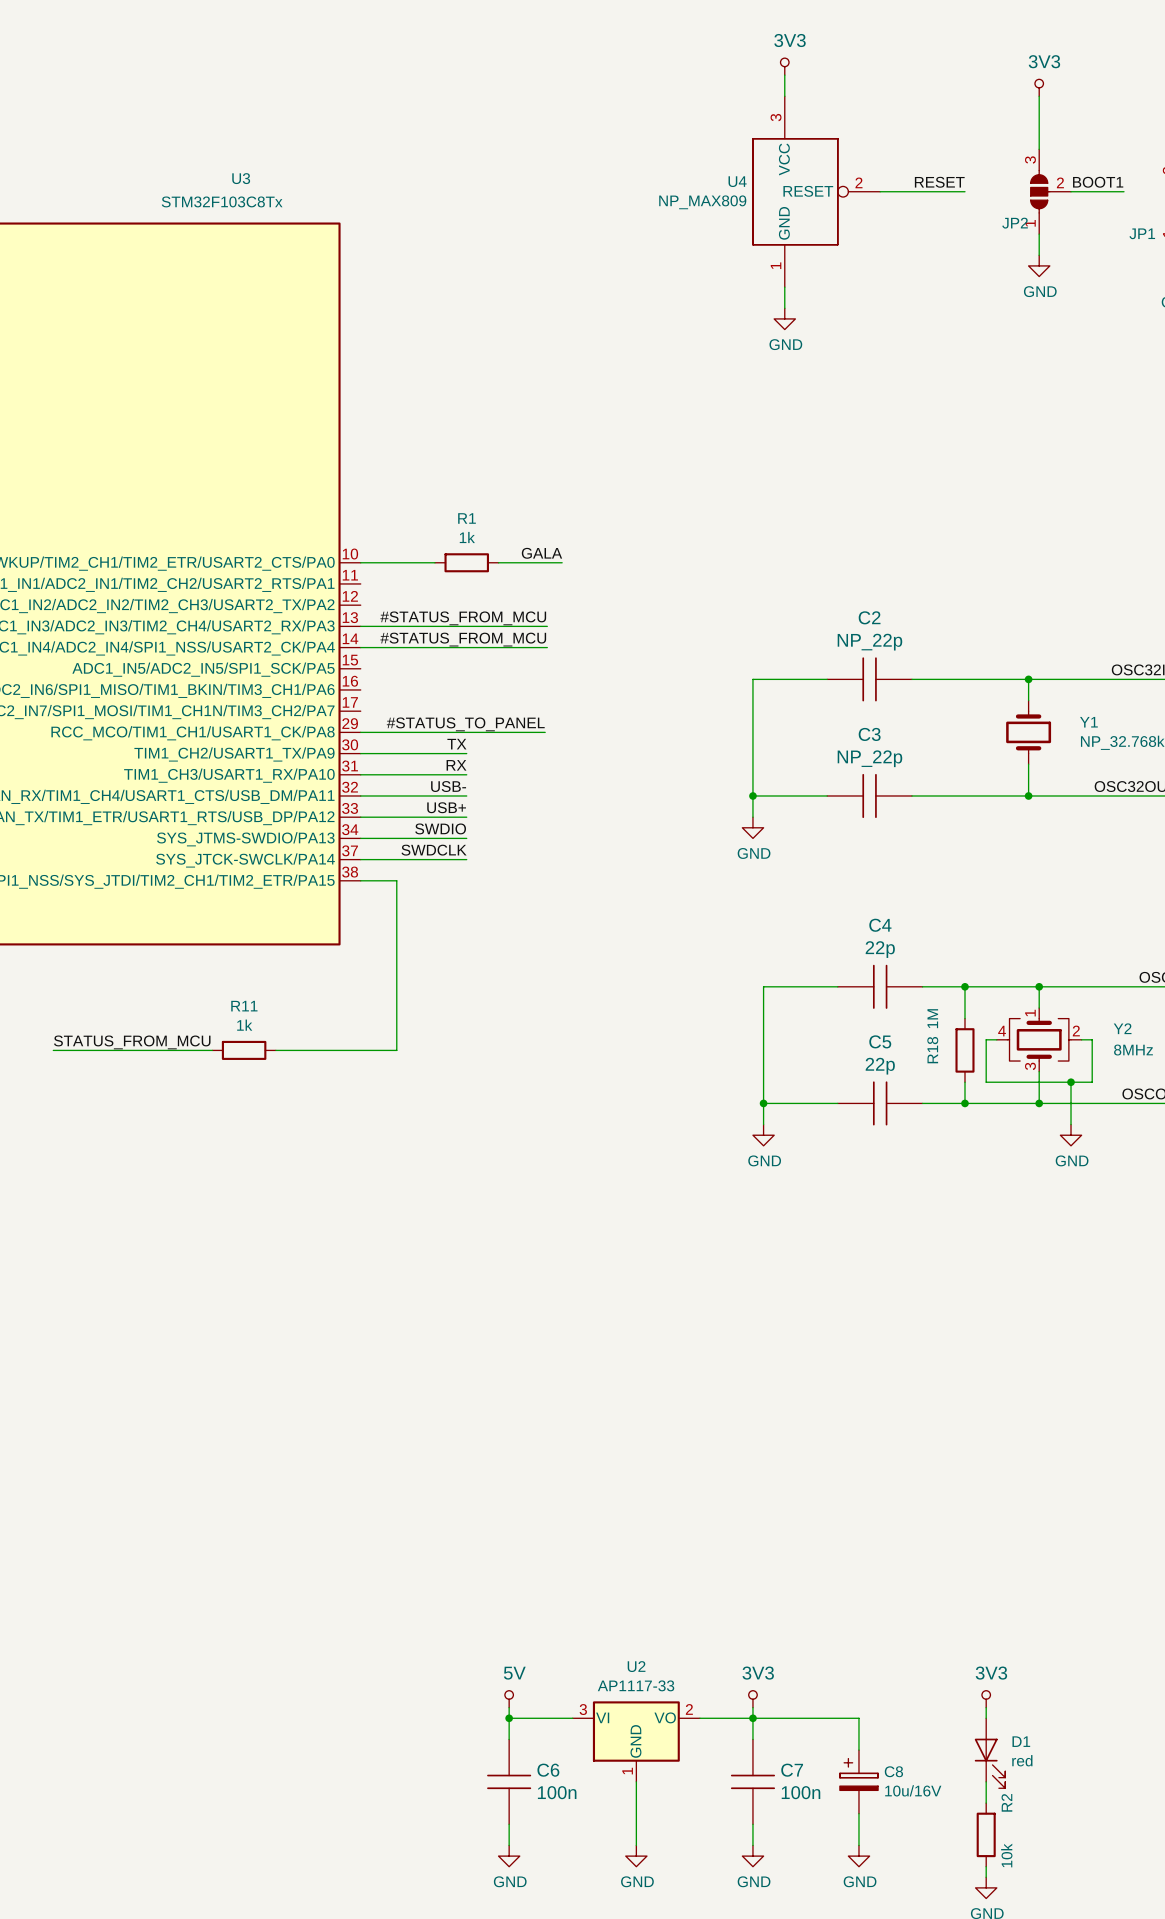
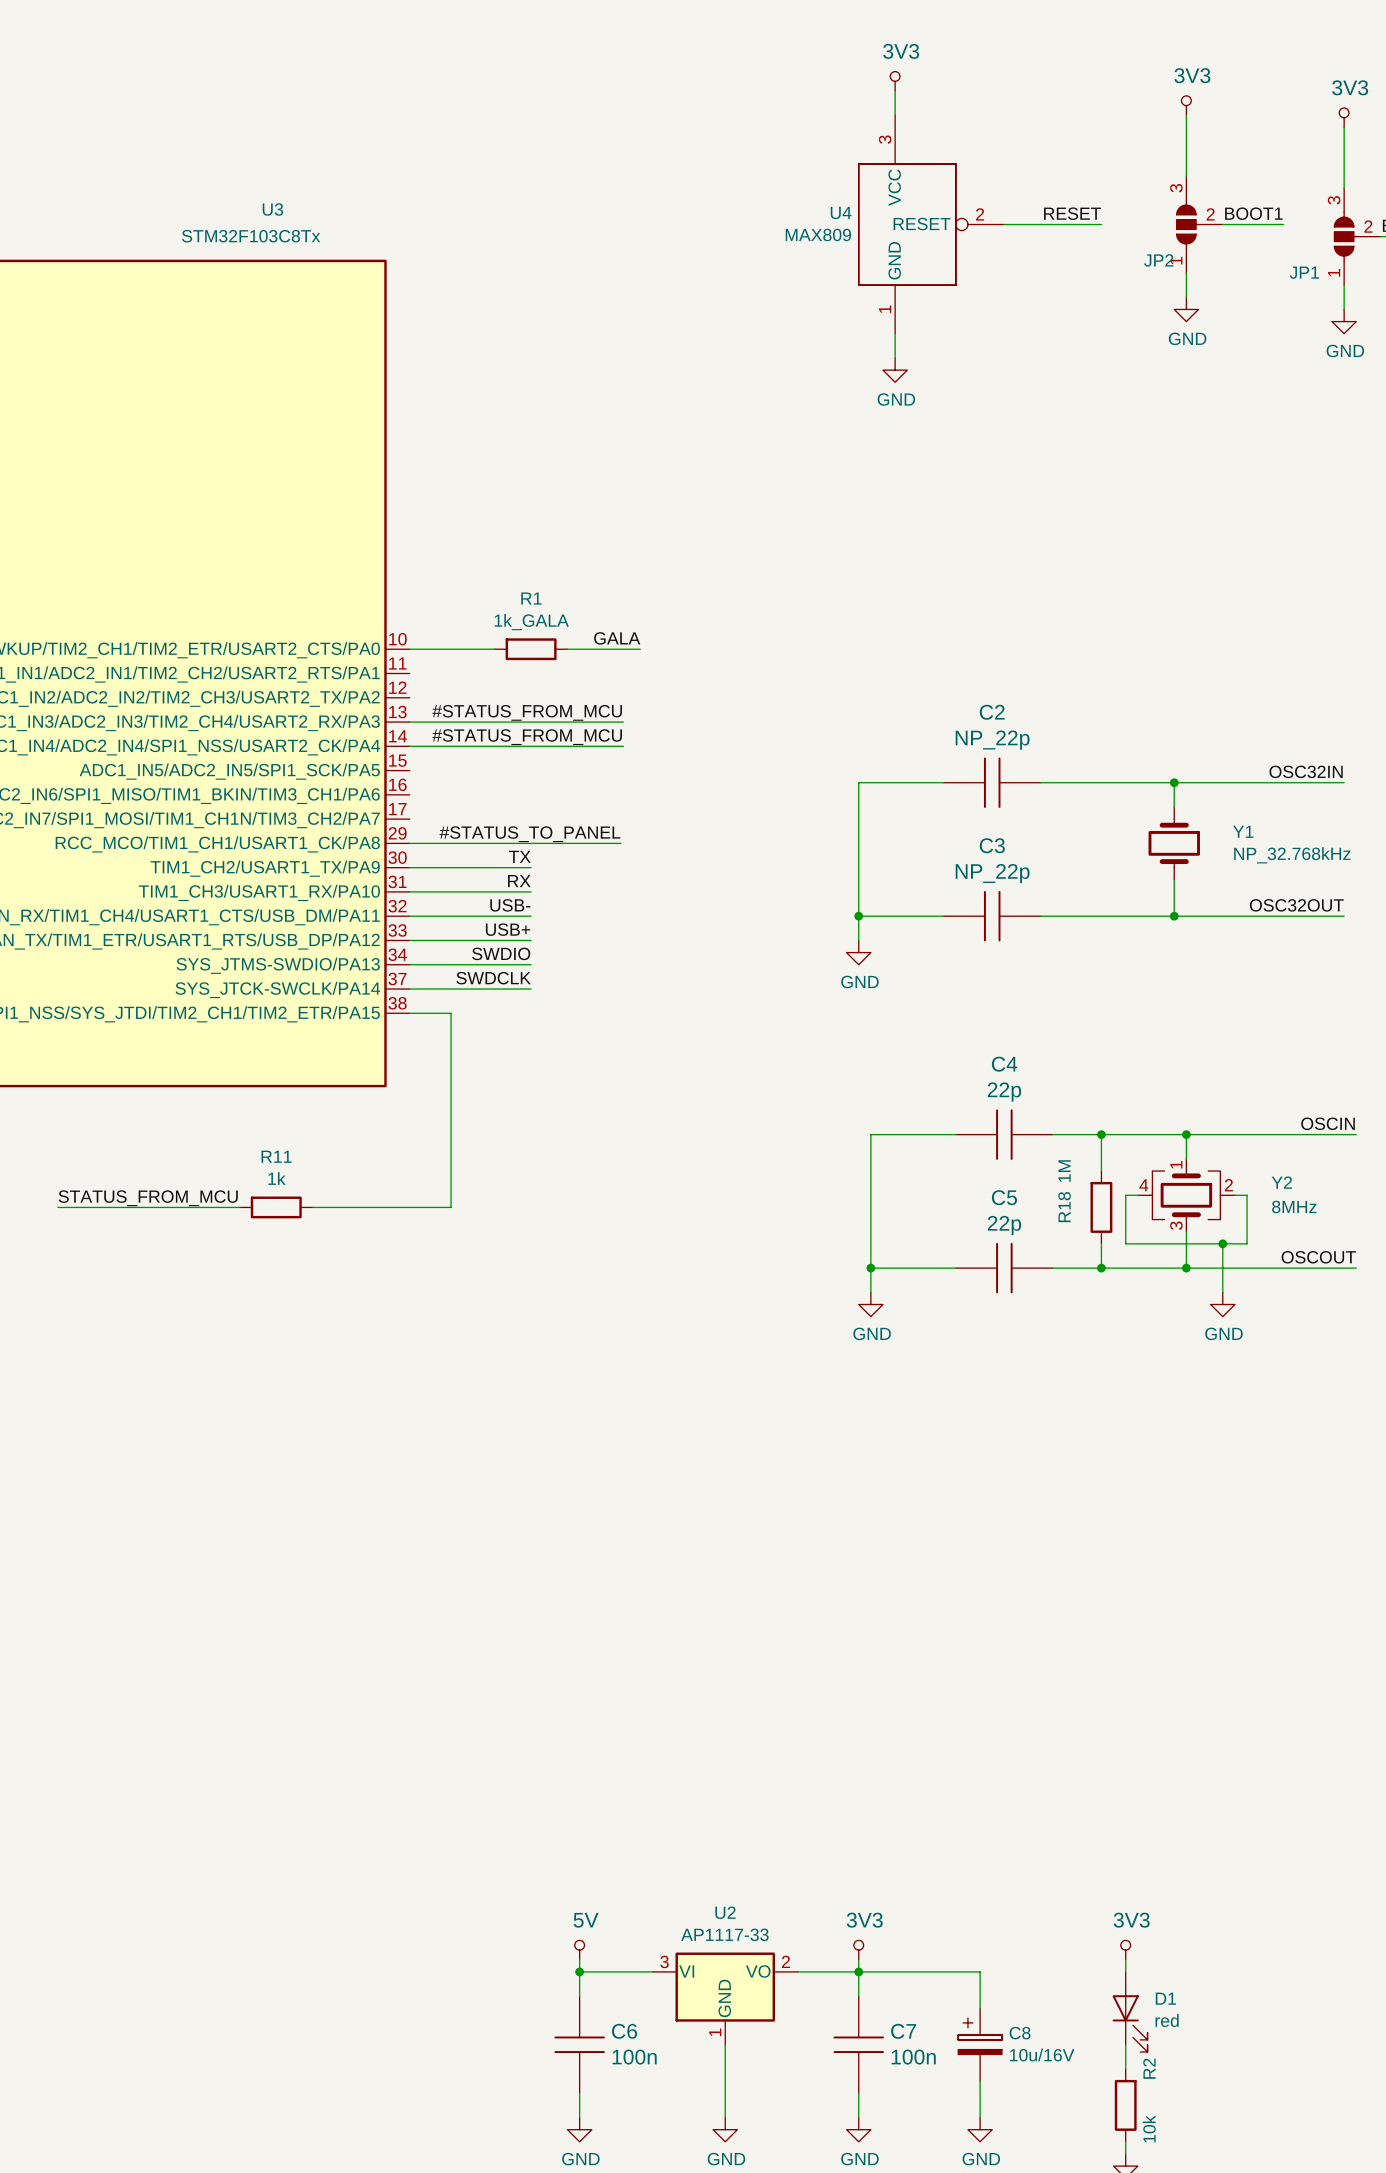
U4 value: NP_MAX809 (702, 202) -> MAX809 (818, 234)
R1 value: 1k (467, 537) -> 1k_GALA (531, 622)

